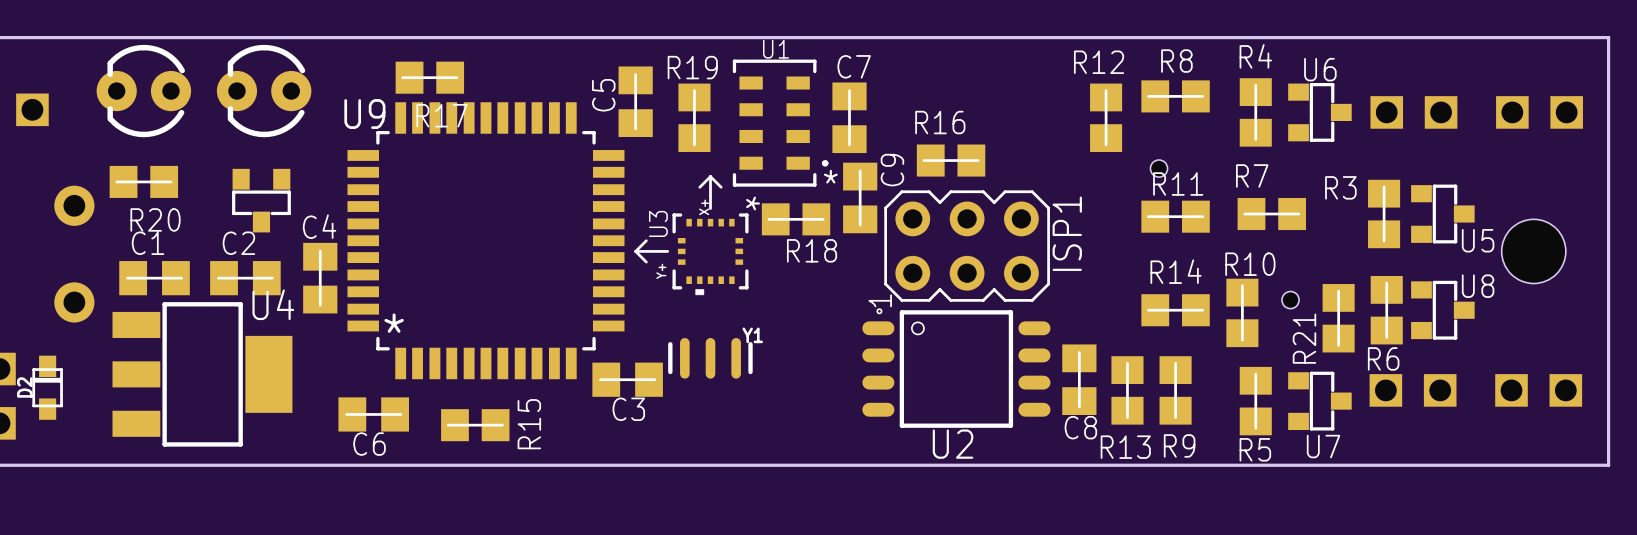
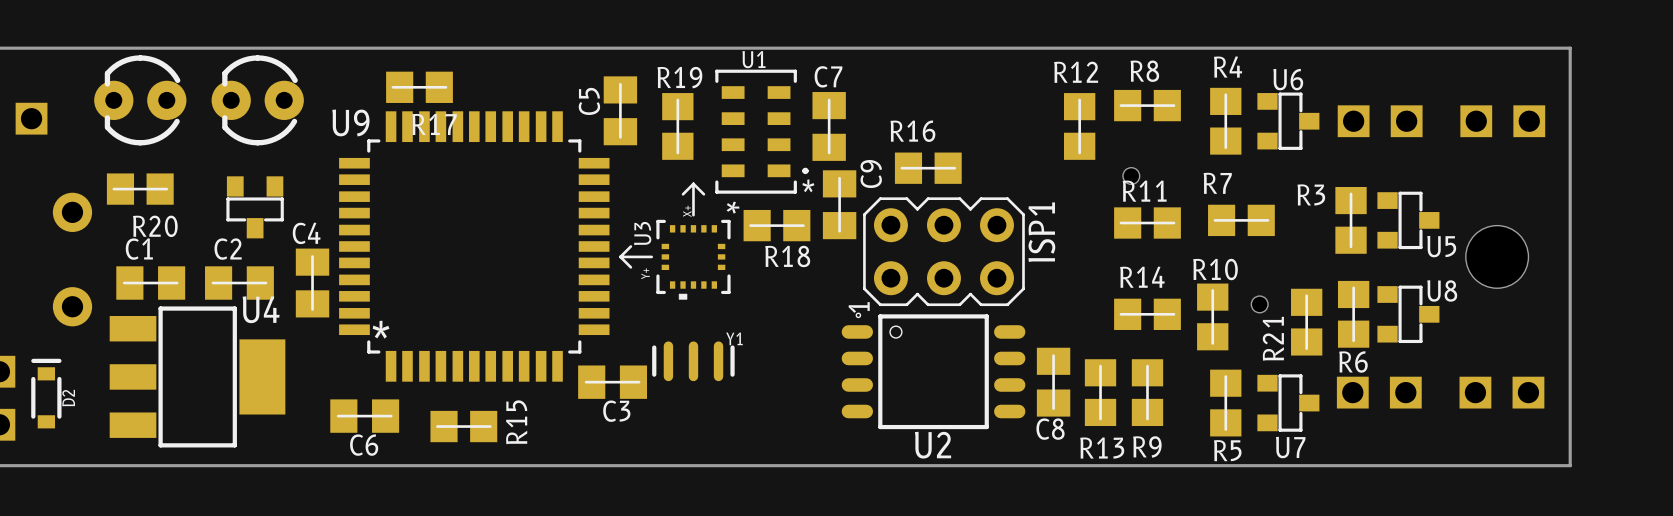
D2 footprint: [32, 355, 63, 420] -> [31, 358, 62, 429]
D2 name position: D2 (24, 387) -> D2 (68, 398)

